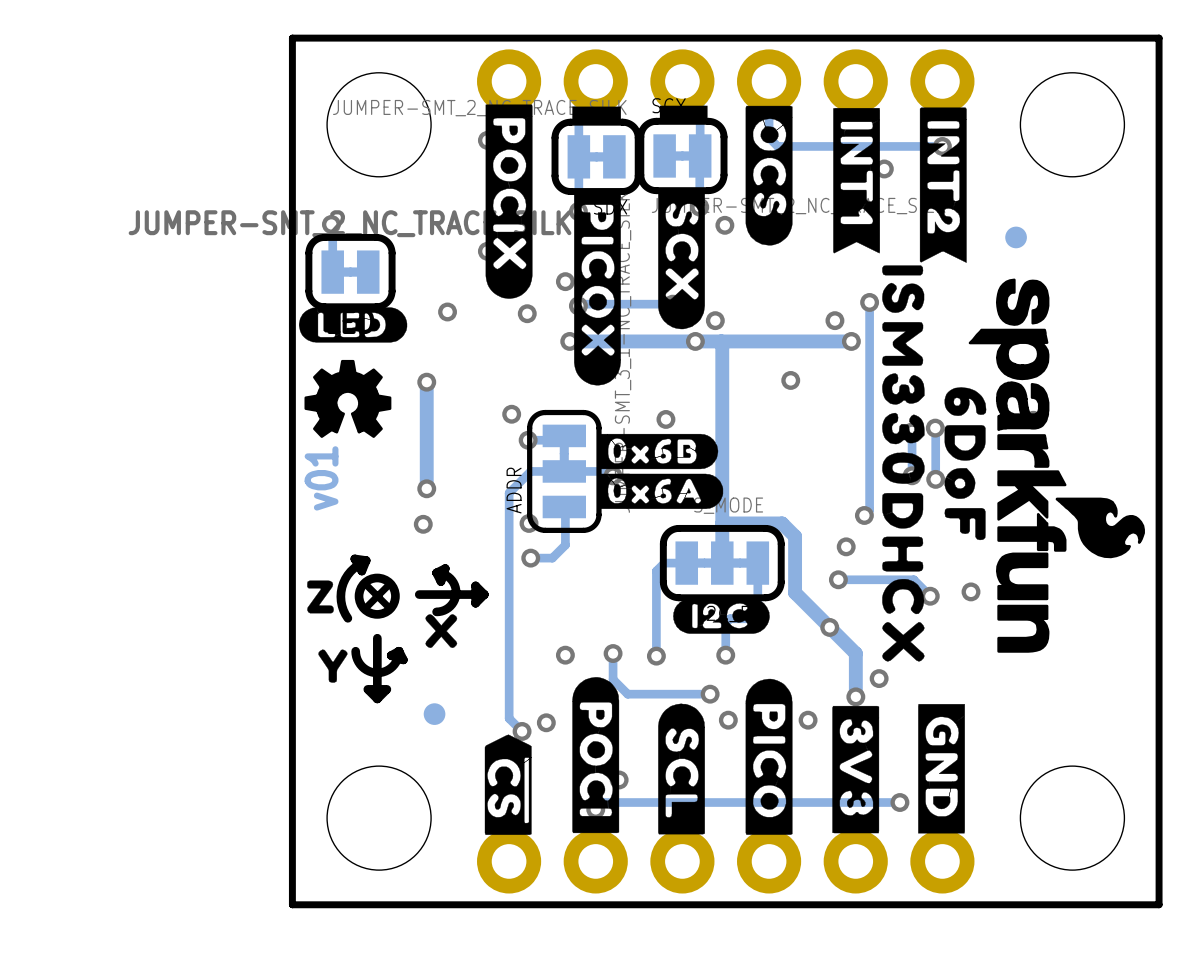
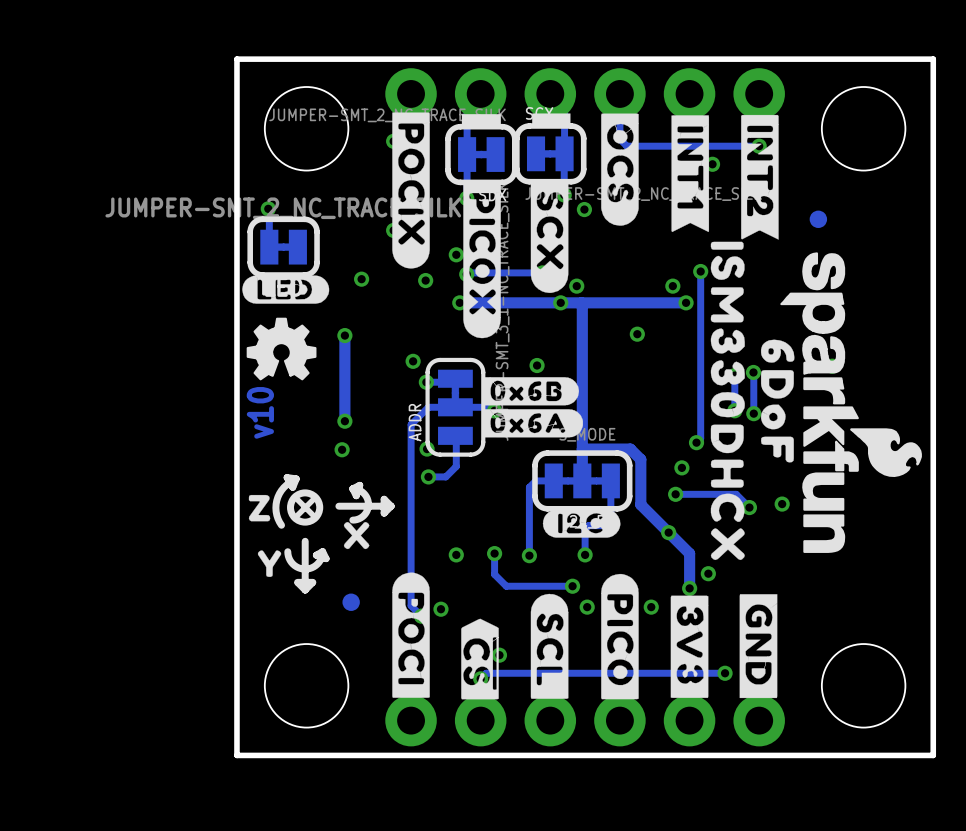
text: v01 (321, 478) -> v10 (260, 412)
drawing position: (595, 755) -> (411, 635)
drawing position: (508, 784) -> (479, 659)

